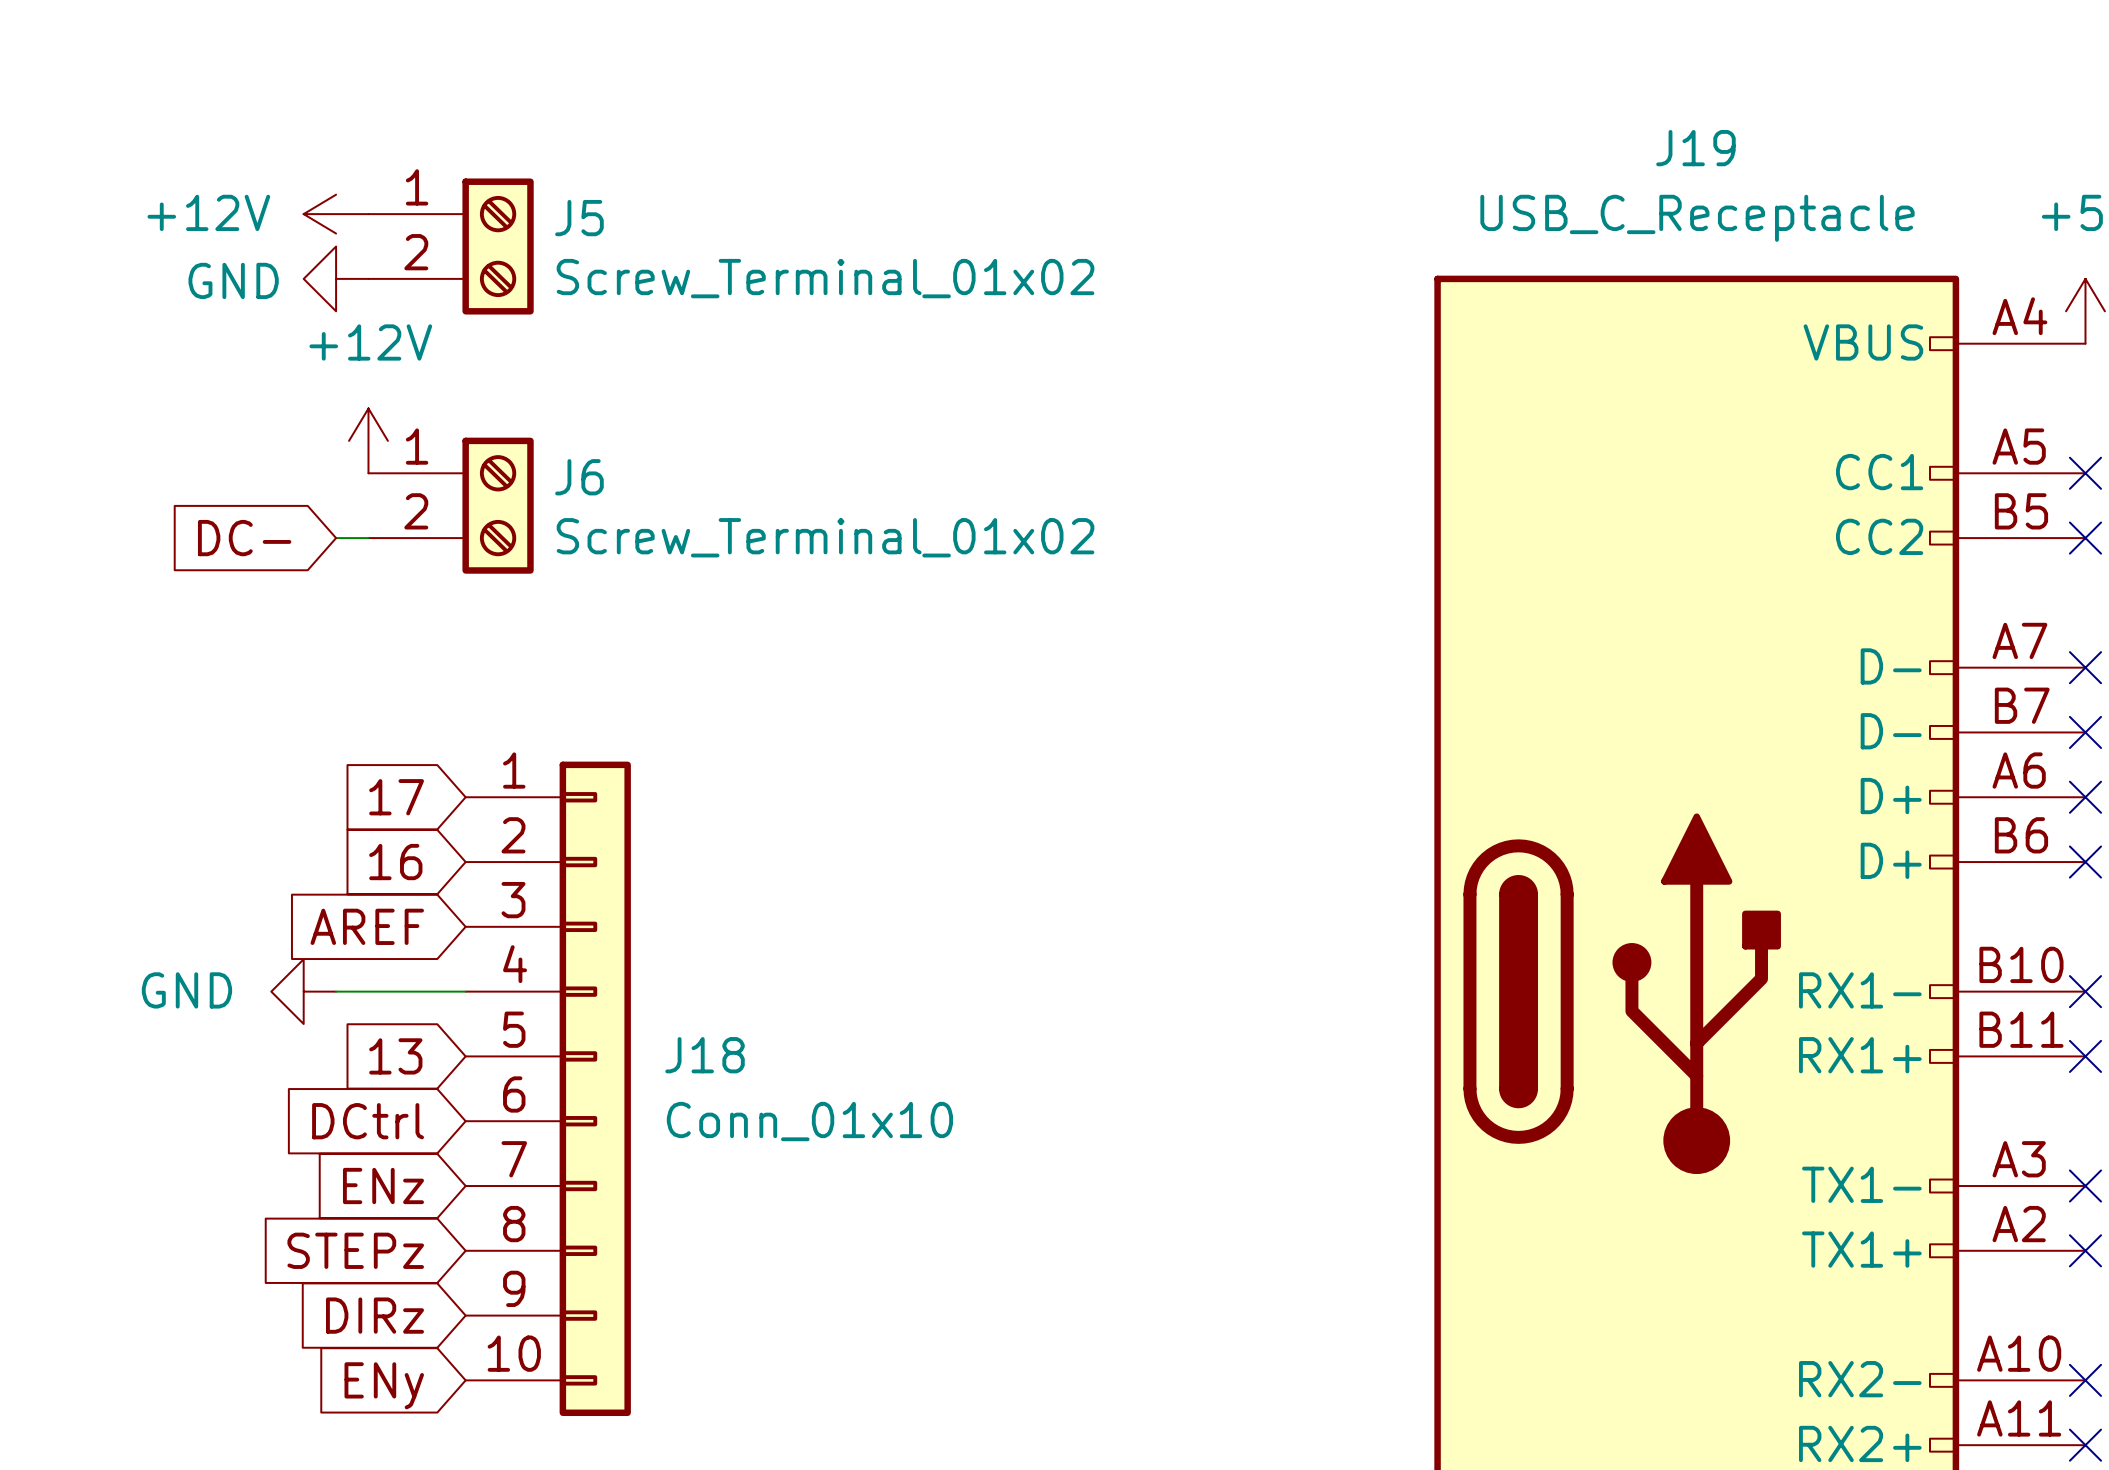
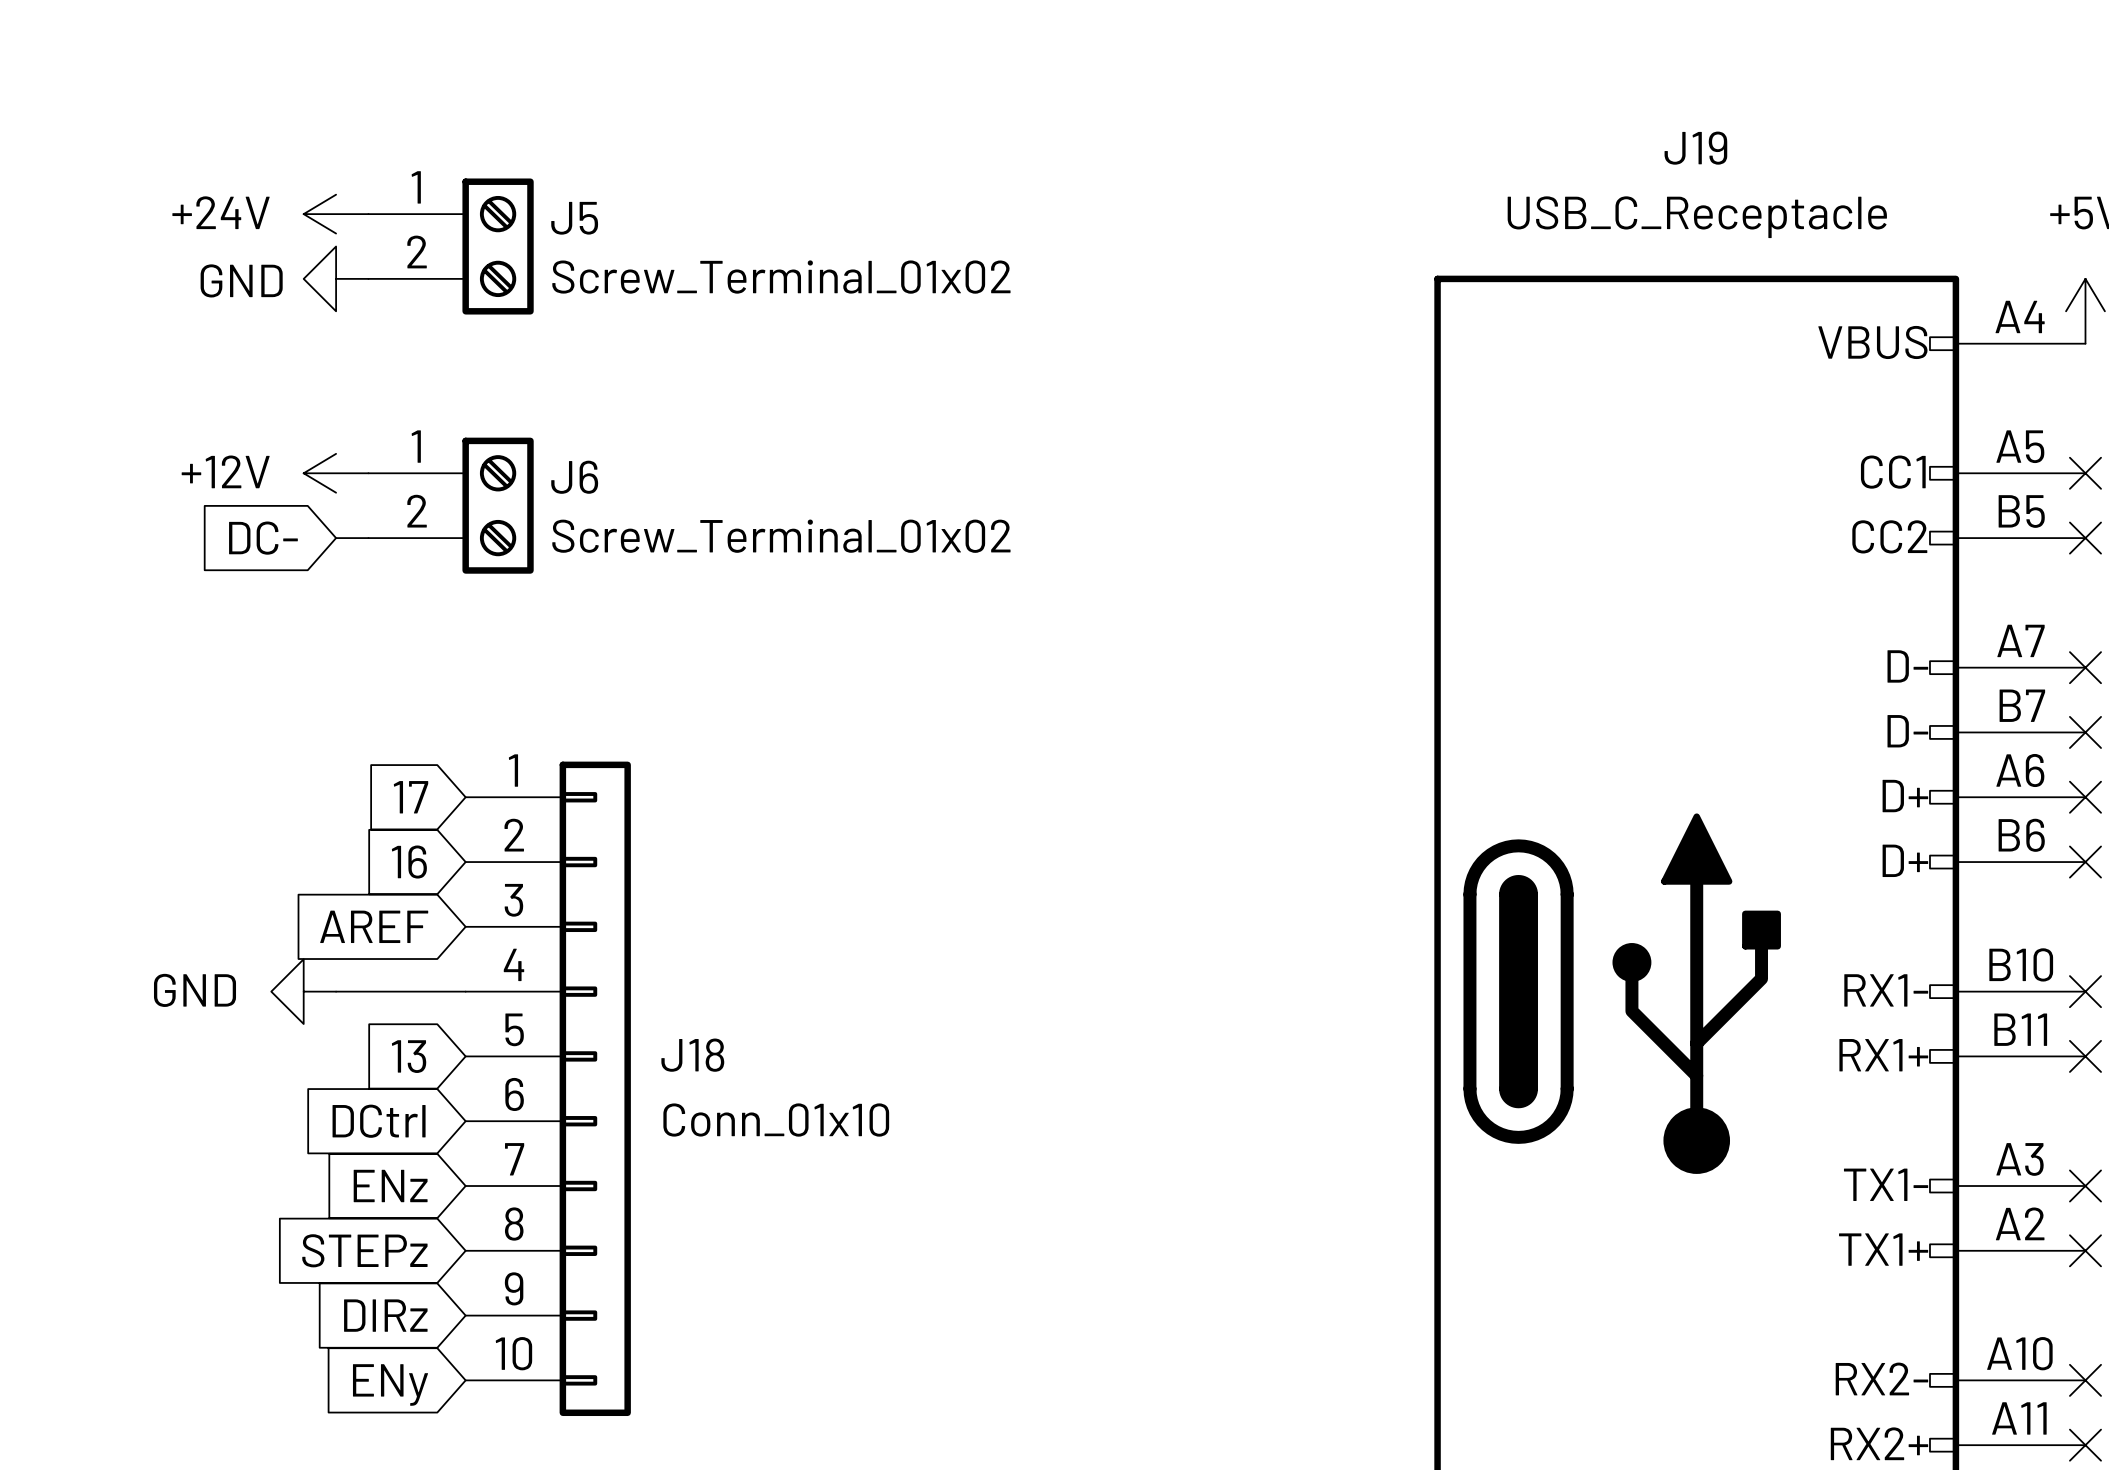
power symbol: +12V (336, 214) -> +24V (336, 214)
power symbol rotation: 0° (368, 440) -> 90° counterclockwise (336, 473)
power symbol position: +12V (368, 440) -> +12V (336, 473)

